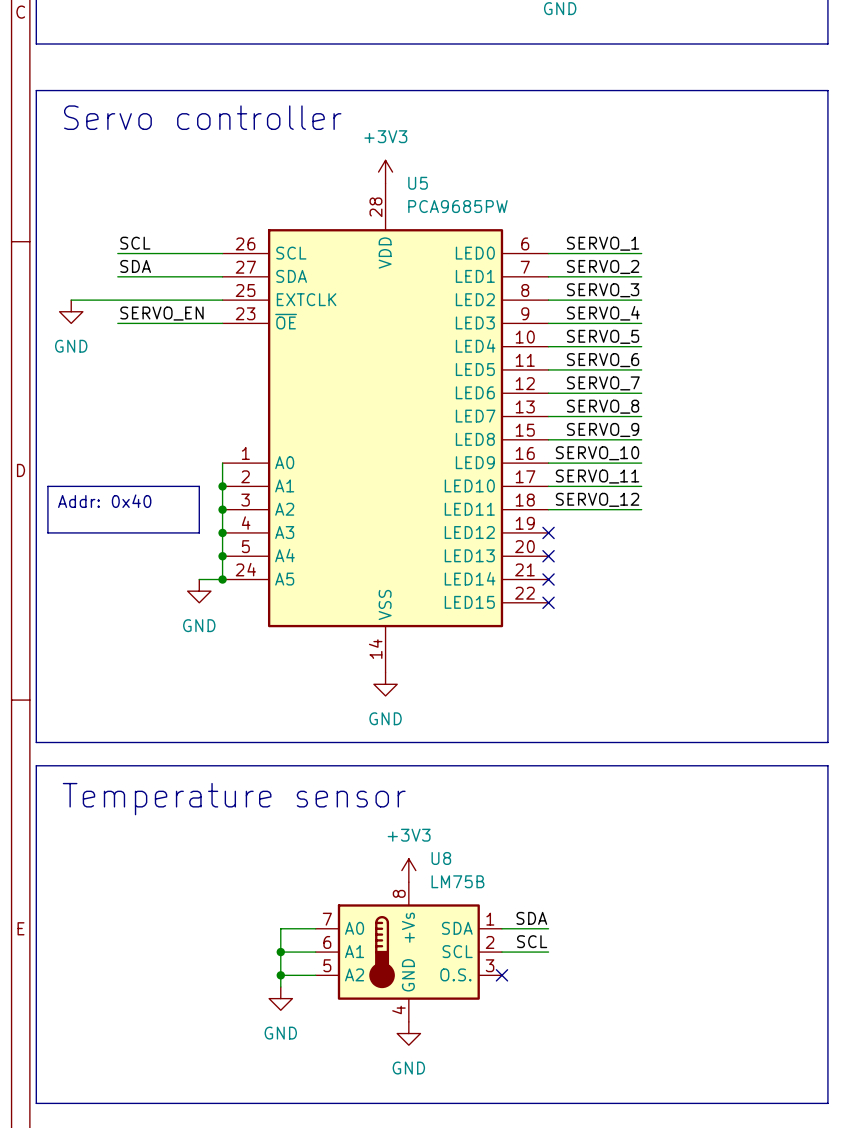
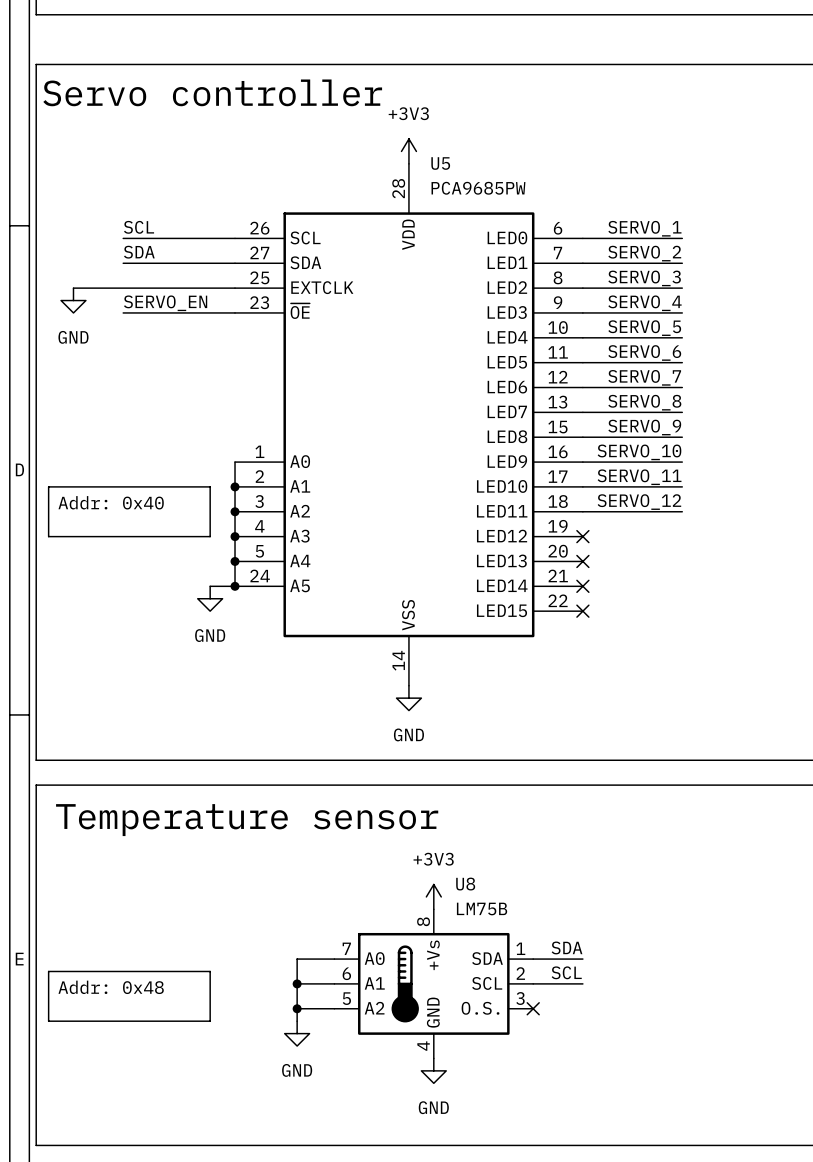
line: none -> (48, 971) (210, 971) (210, 1021) (48, 1021) (48, 971)
text: none -> Addr: 0x48 (111, 987)

